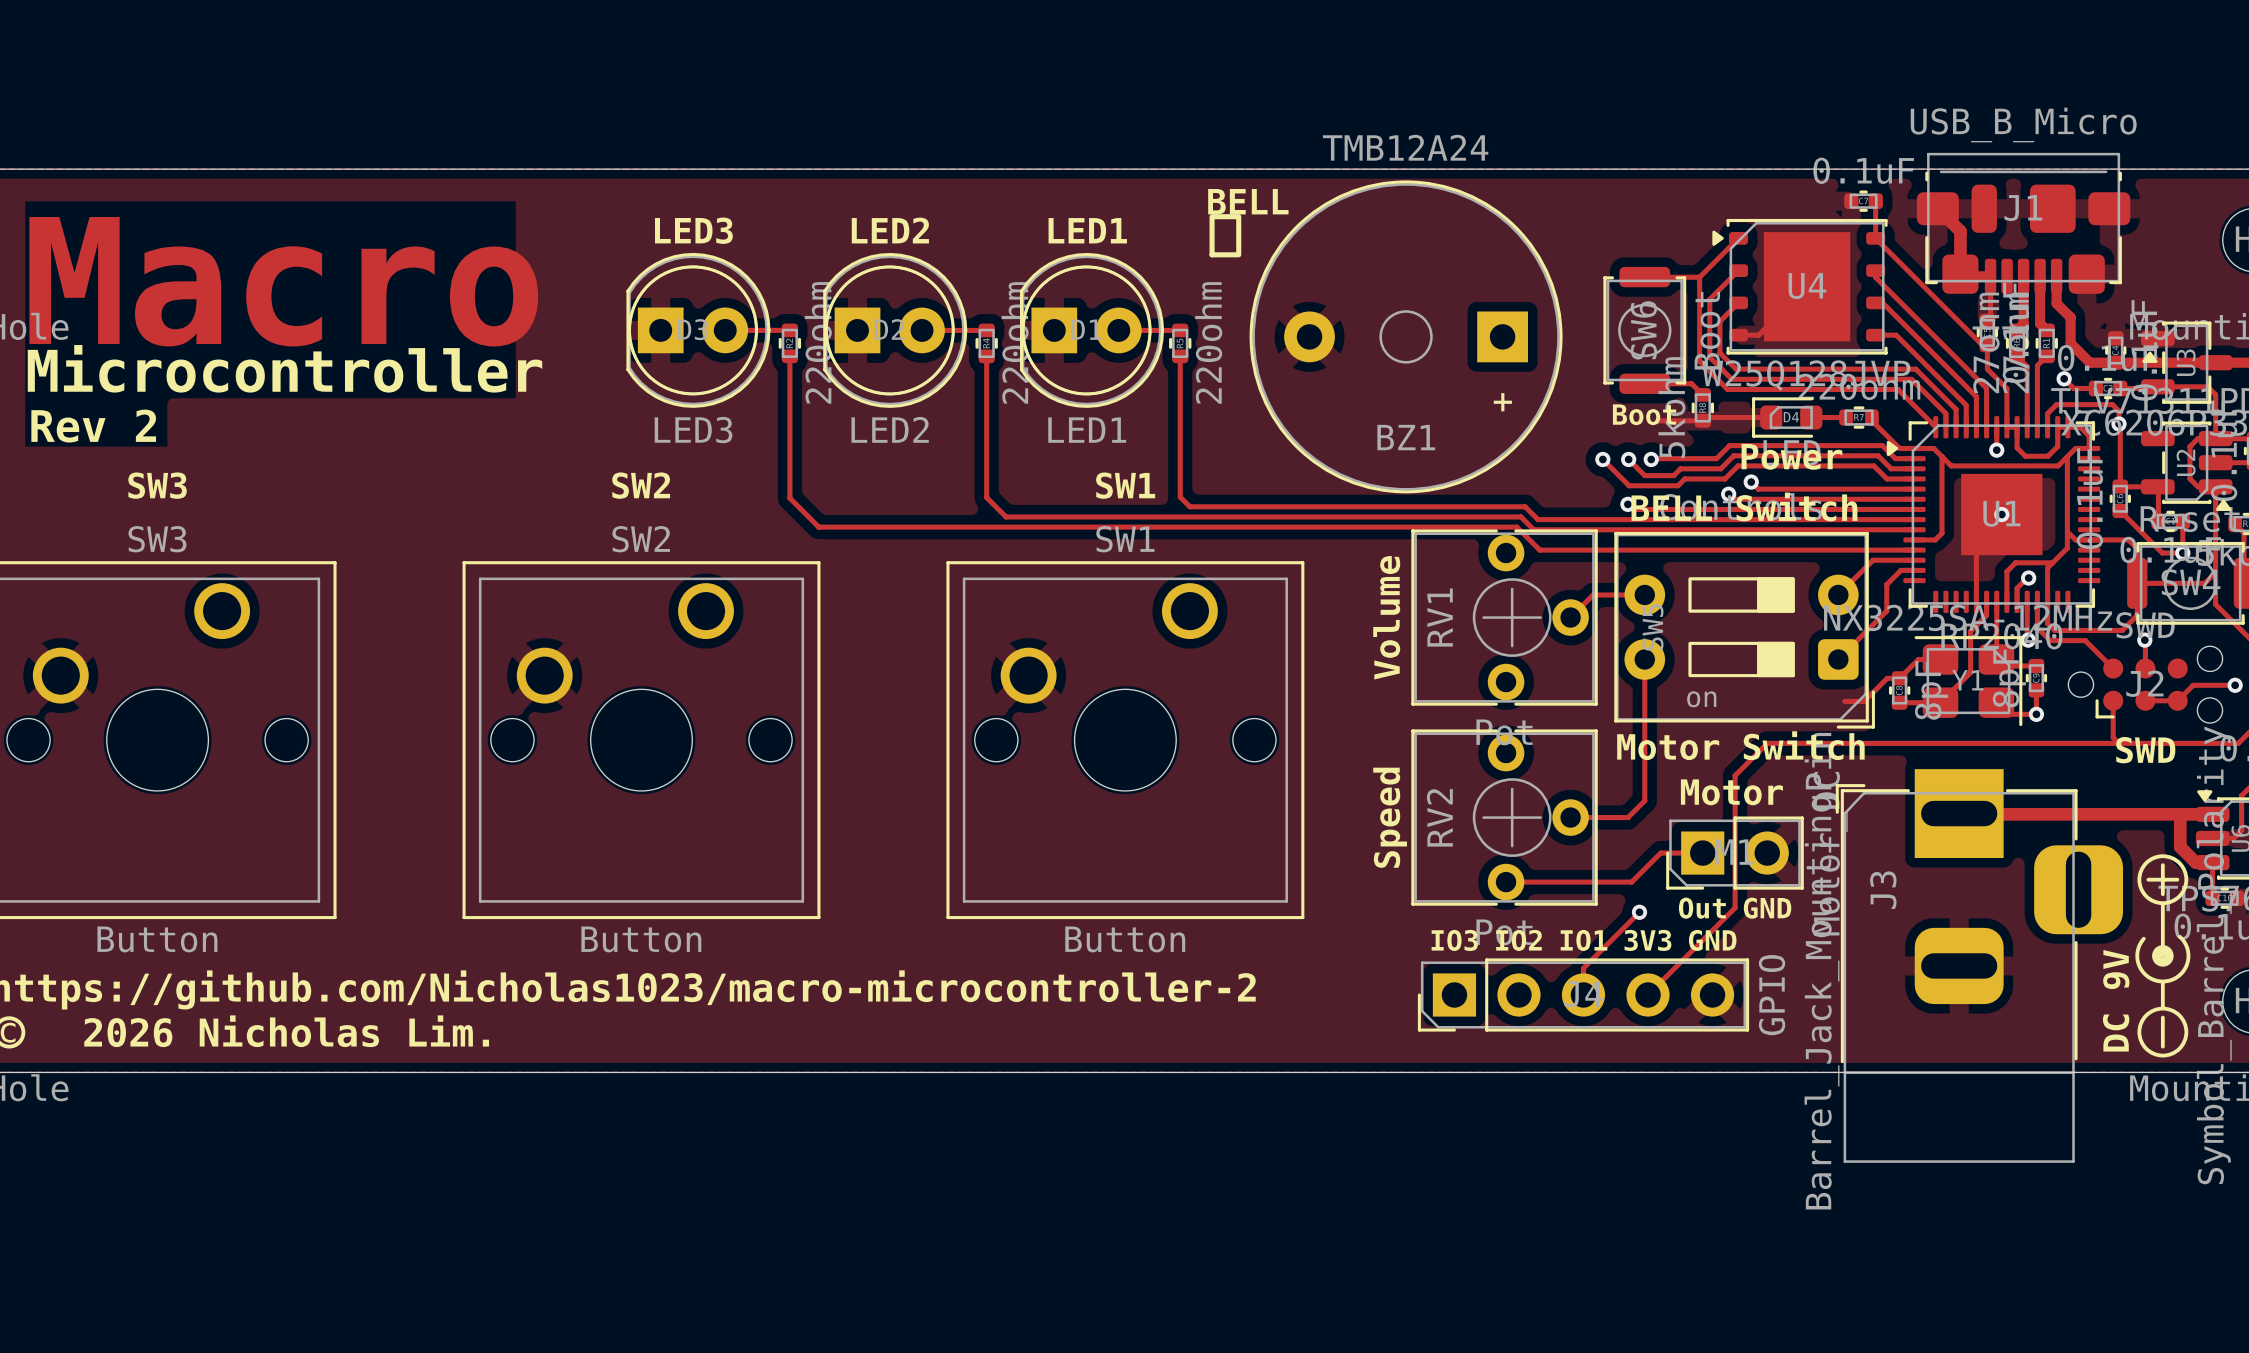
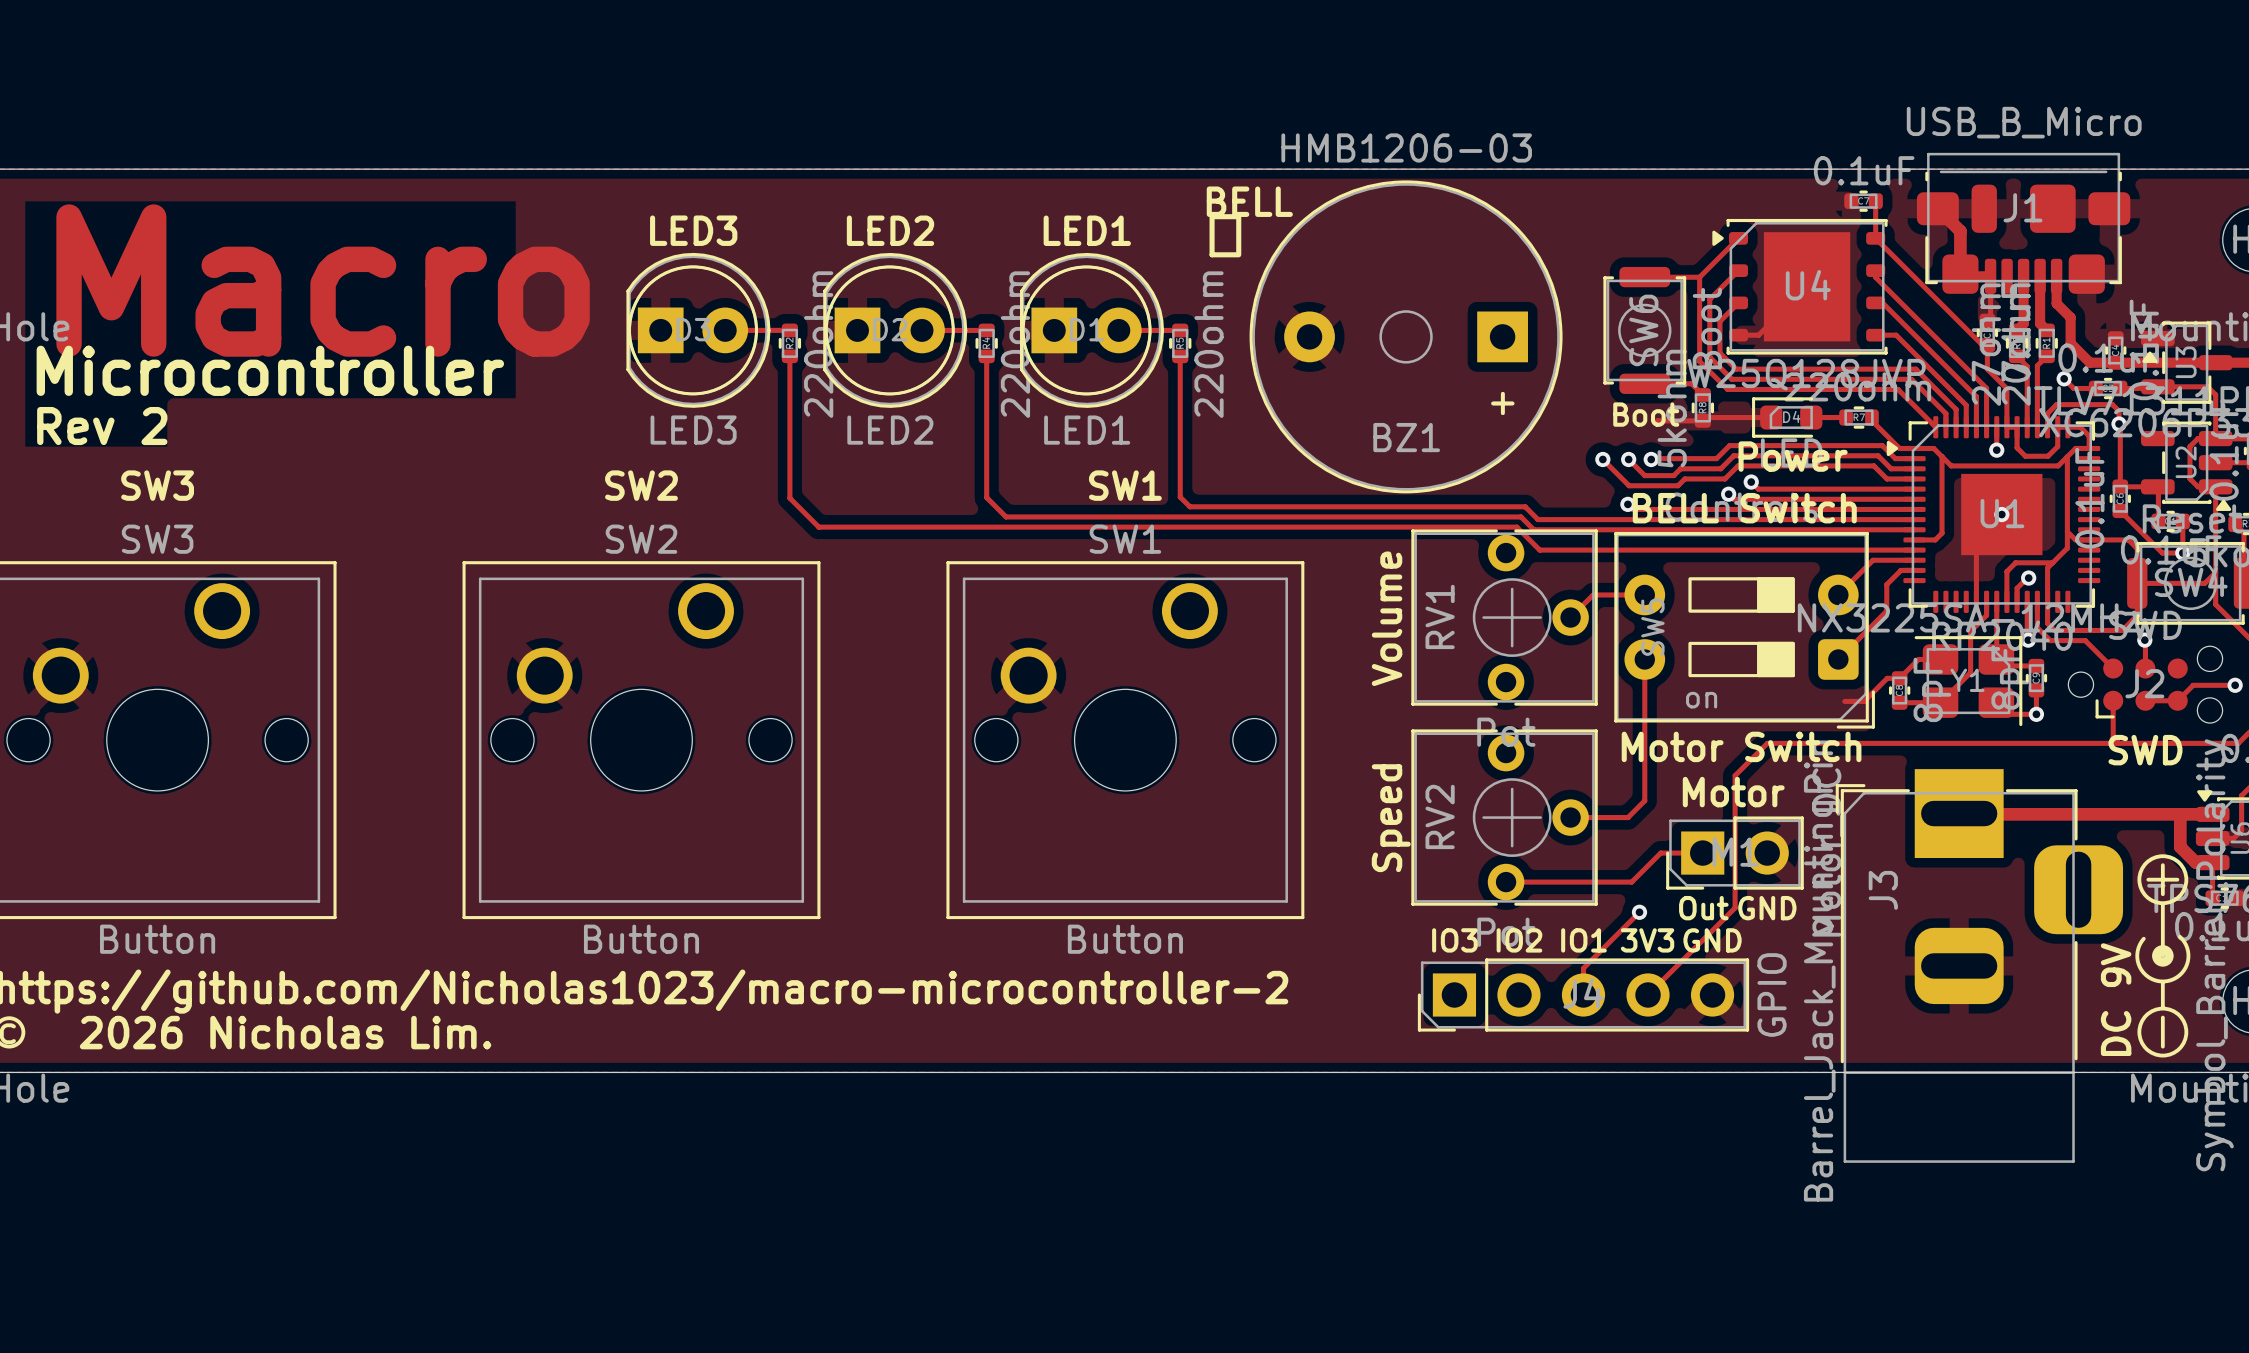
BZ1 value: TMB12A24 (1405, 147) -> HMB1206-03 (1406, 147)

